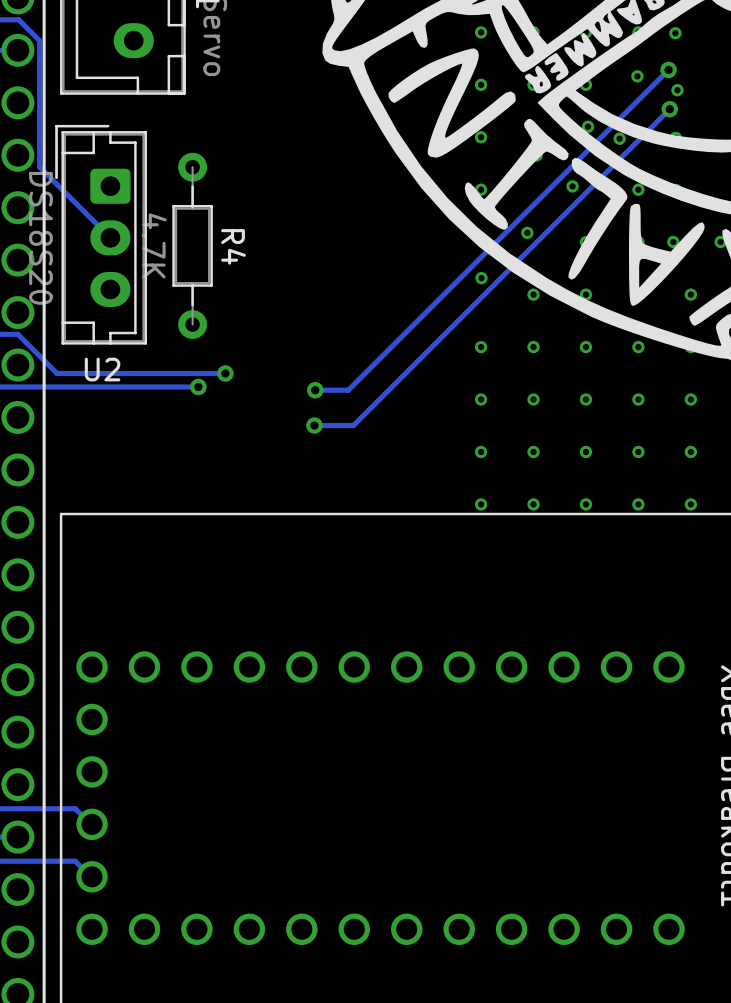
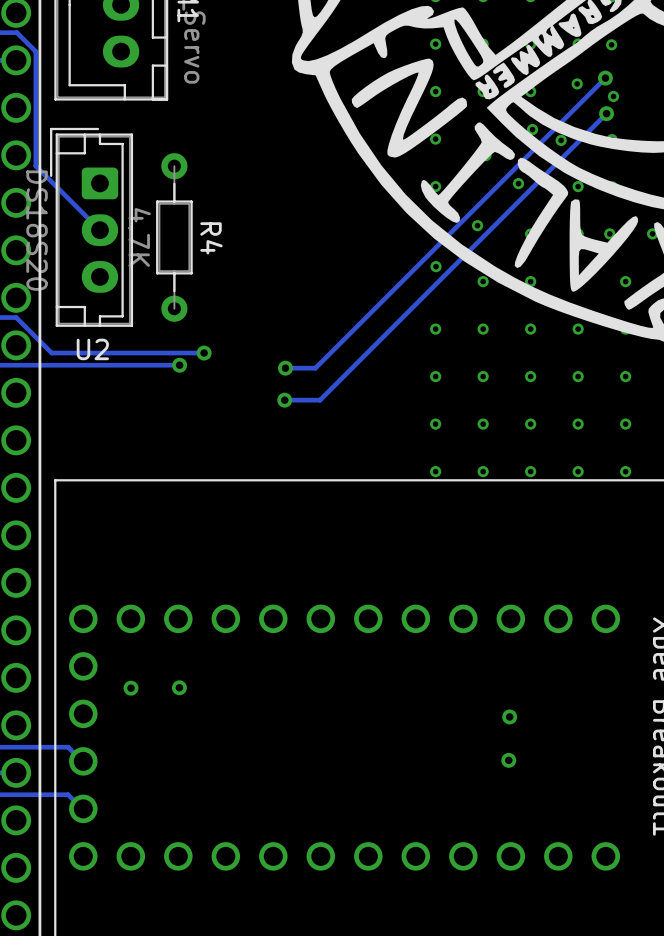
via: none -> (131, 688)
via: none -> (179, 687)
via: none -> (509, 716)
via: none -> (508, 760)

